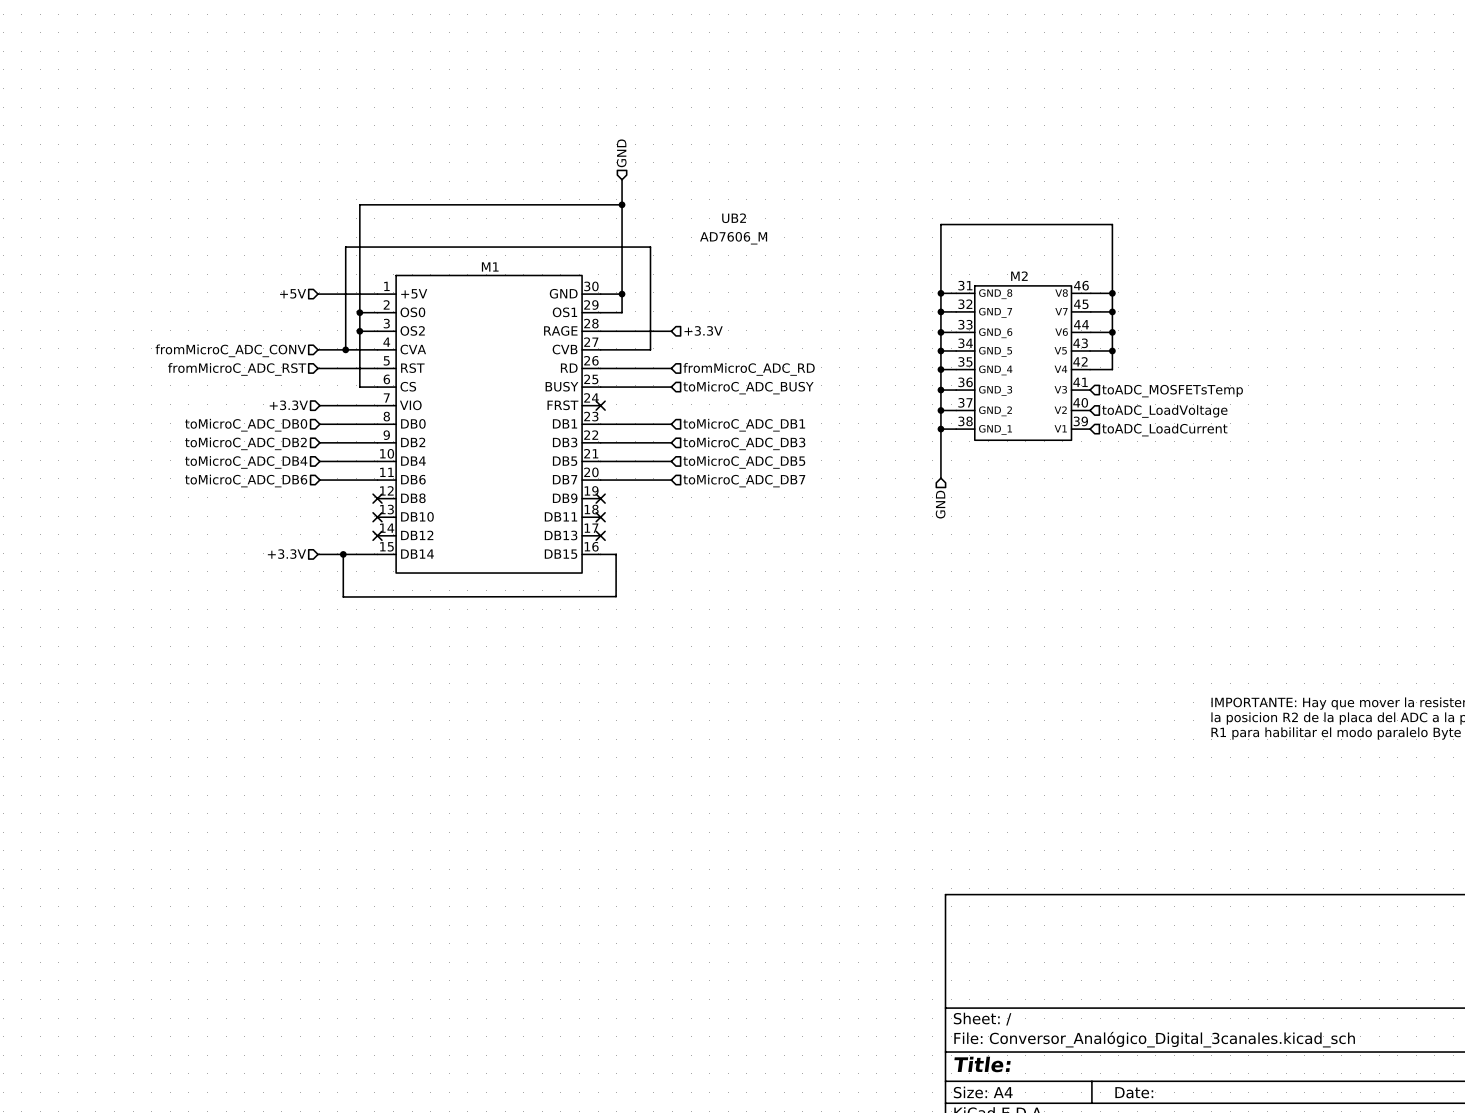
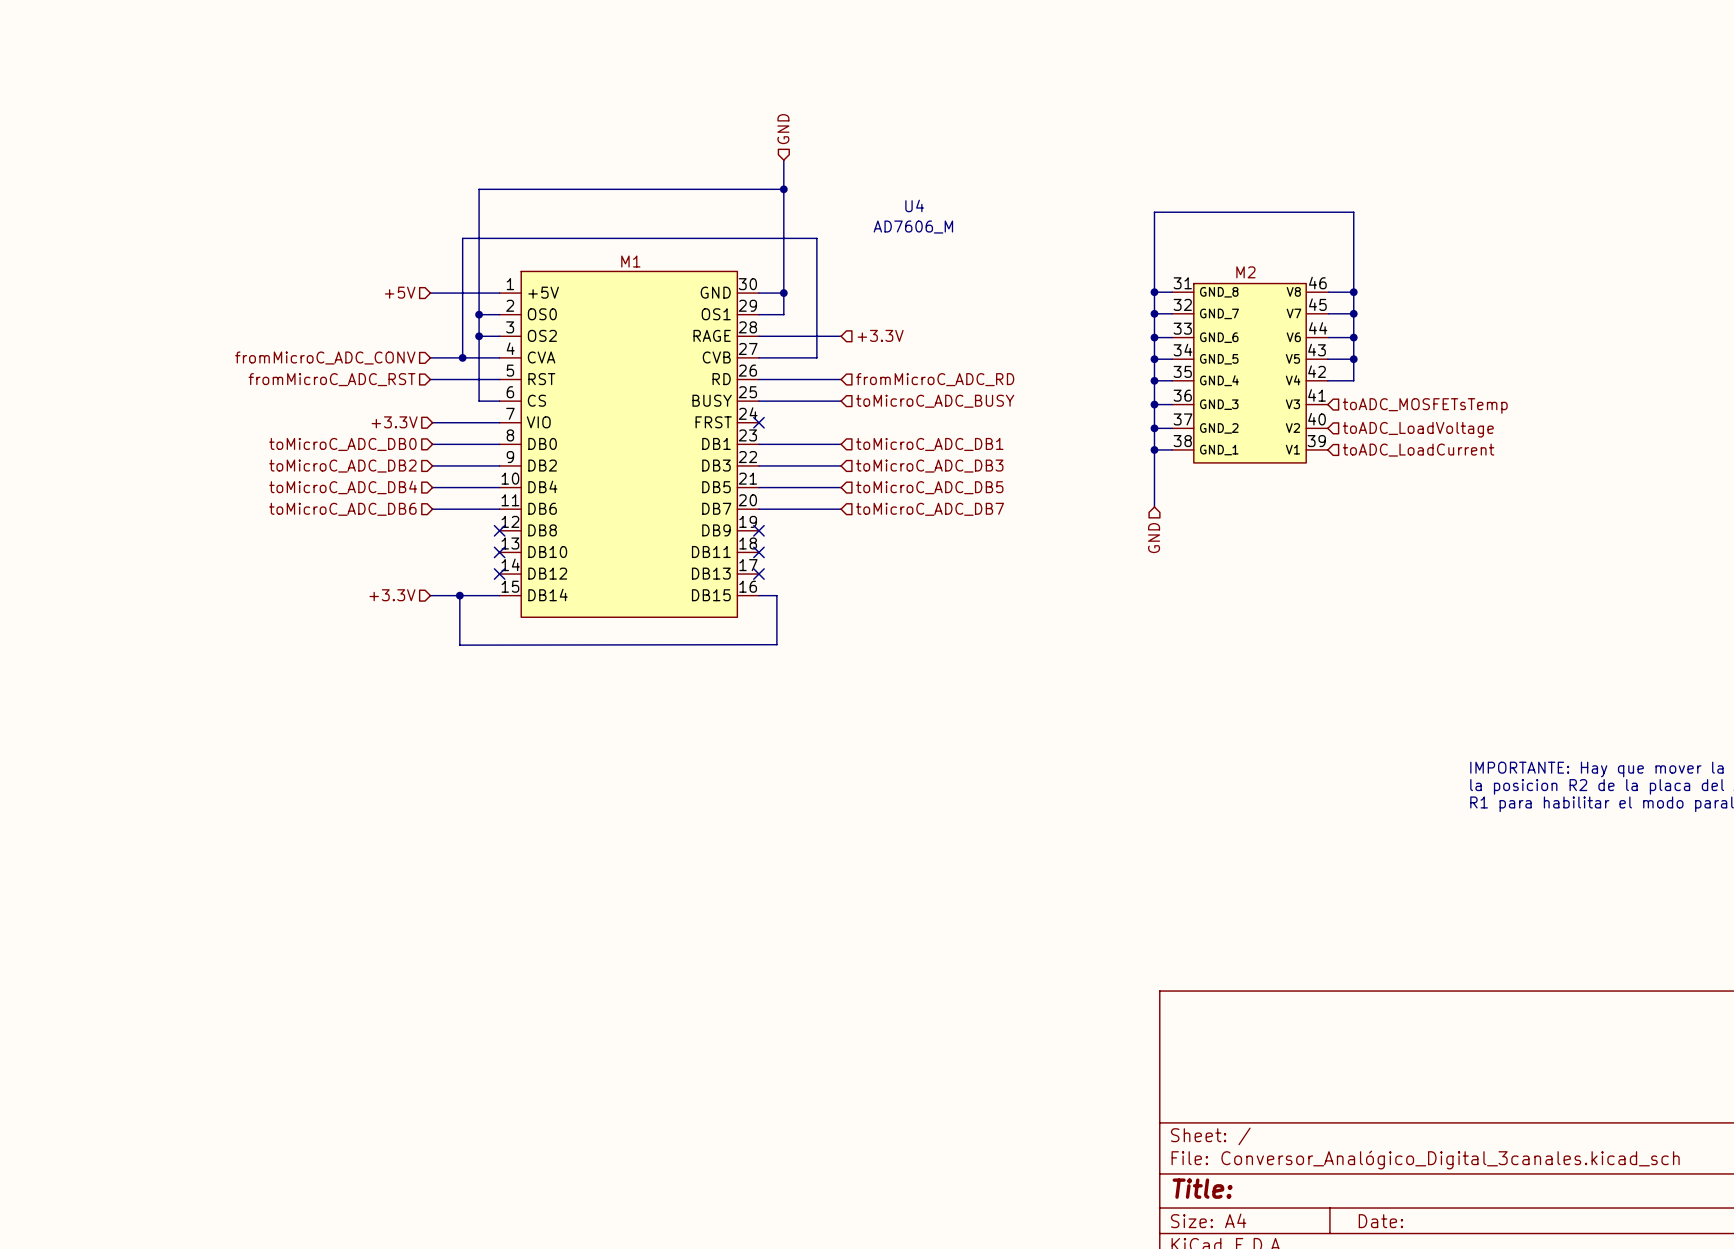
UB2 name: UB2 (734, 218) -> U4 (914, 205)

